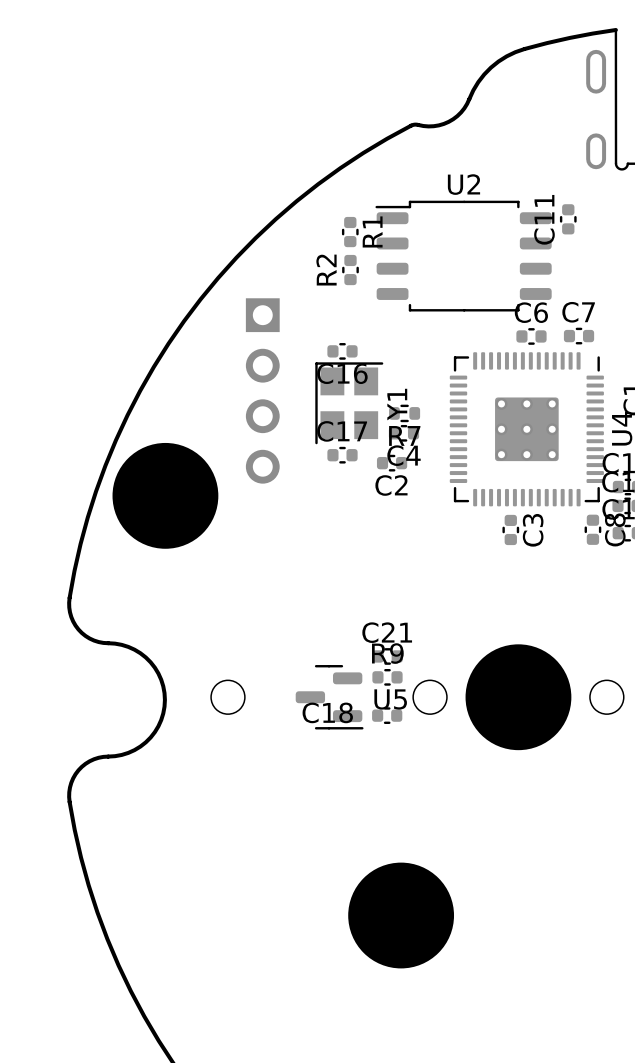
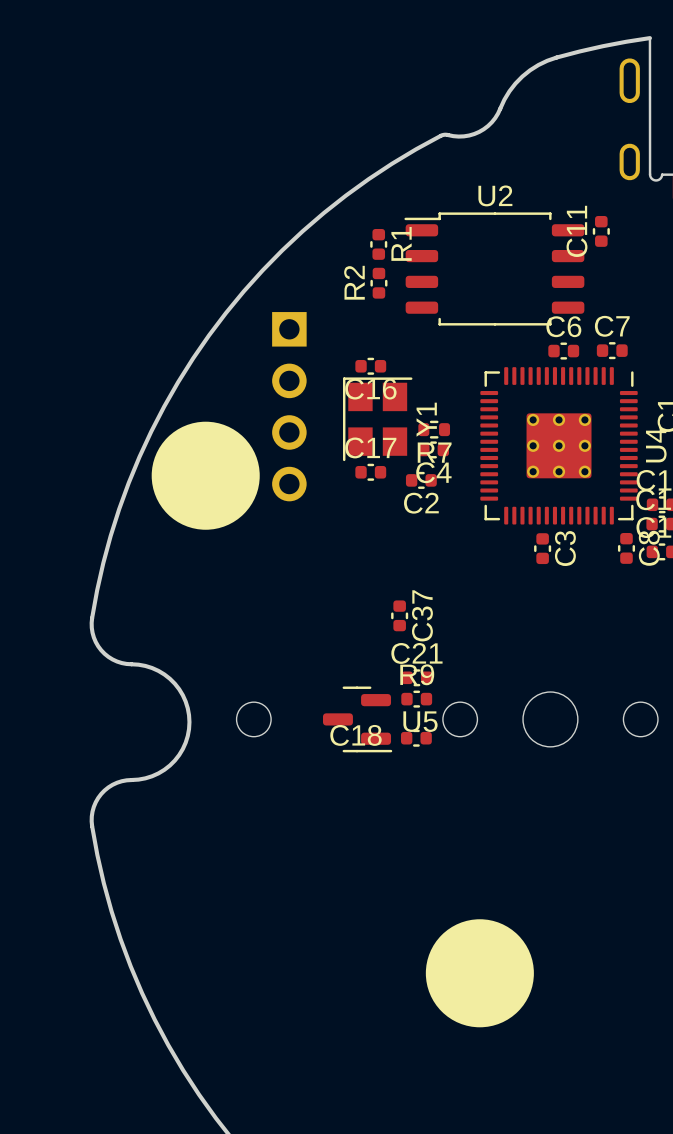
drawing position: (165, 495) -> (205, 475)
C37: none -> (399, 615)
drawing: [465, 644, 572, 751] -> none
drawing position: (401, 915) -> (479, 973)

